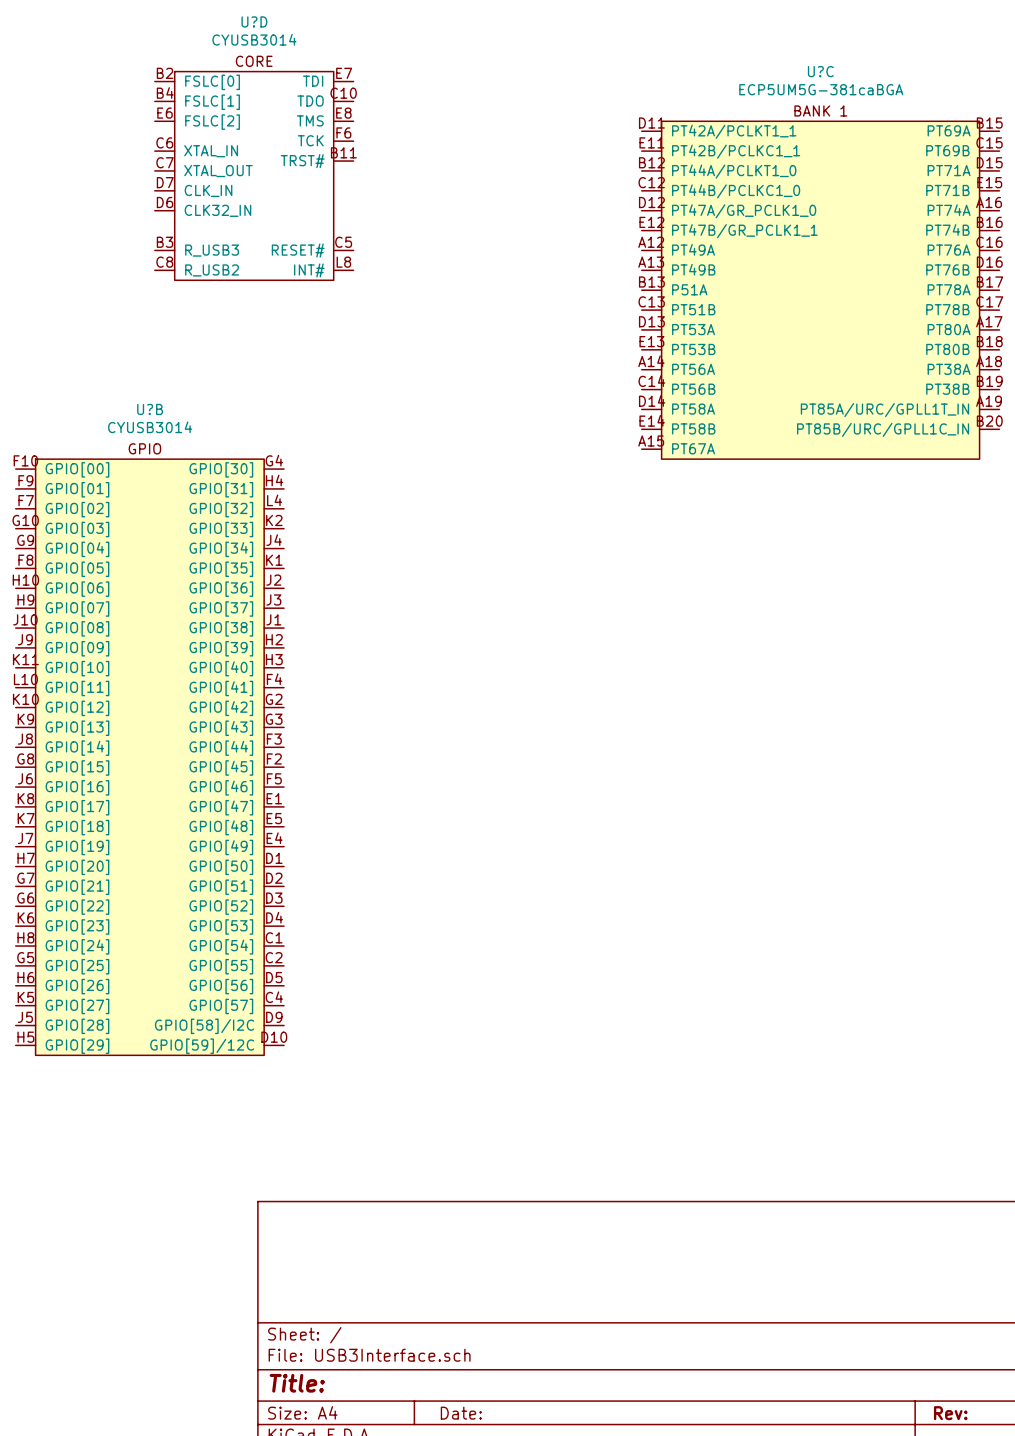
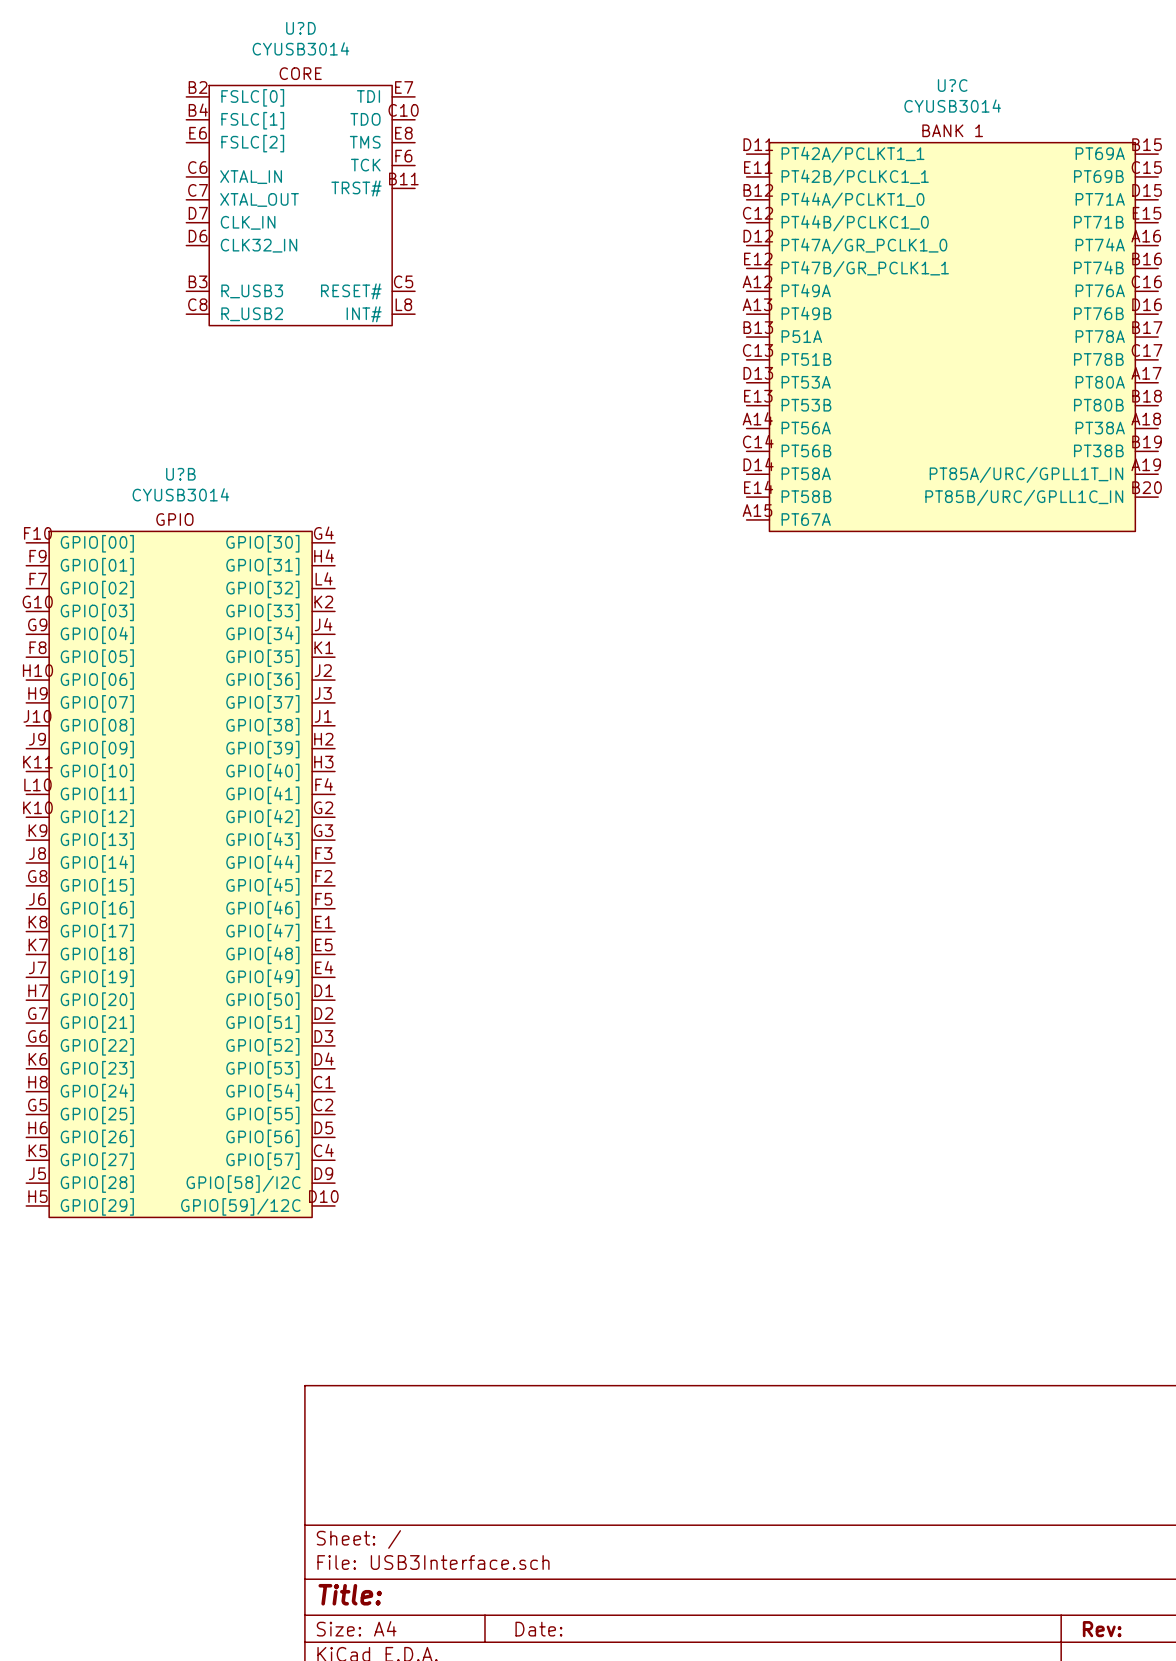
U?C value: ECP5UM5G-381caBGA (821, 89) -> CYUSB3014 (952, 106)

